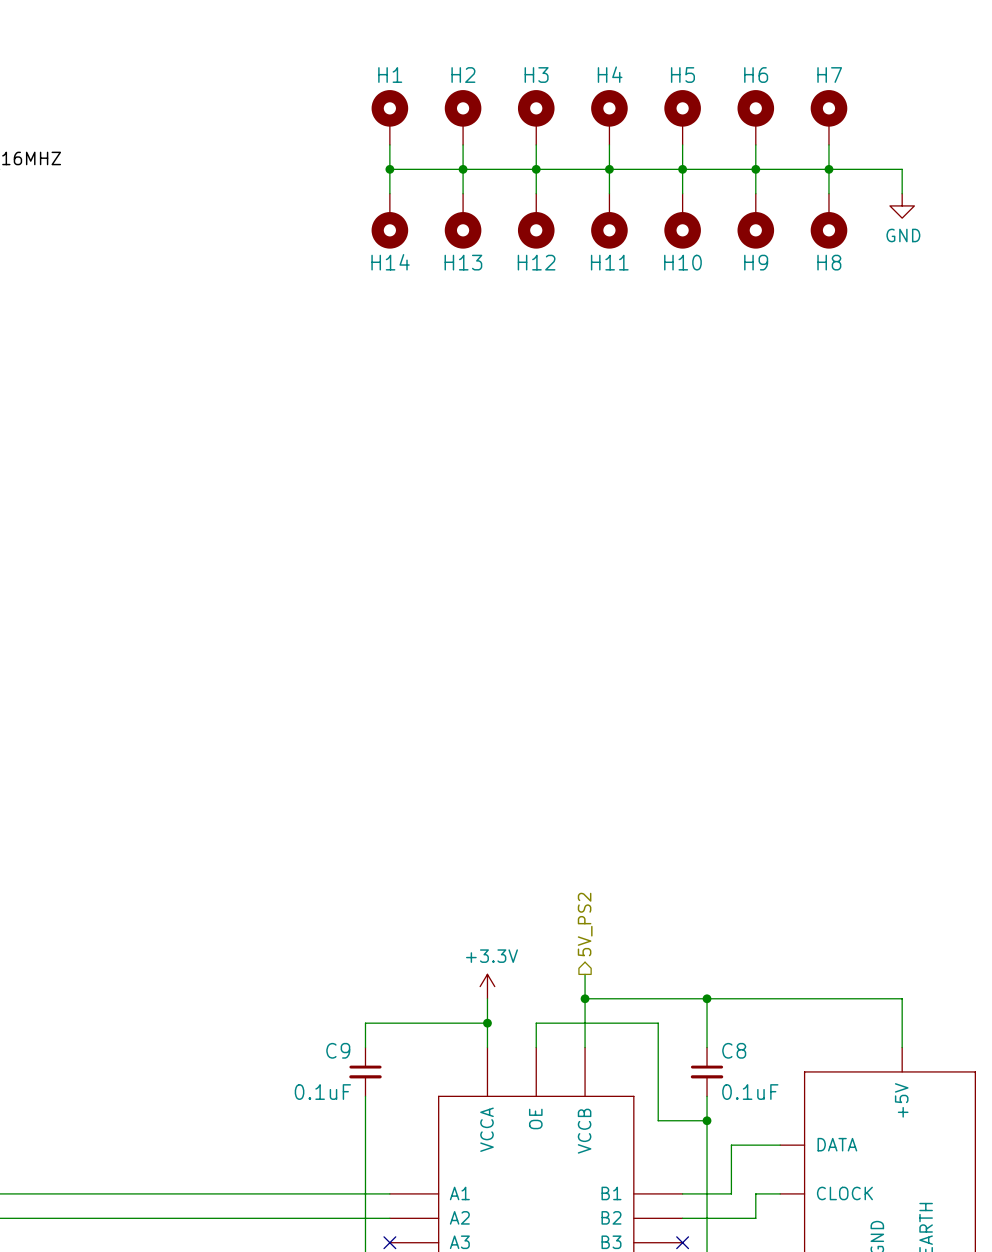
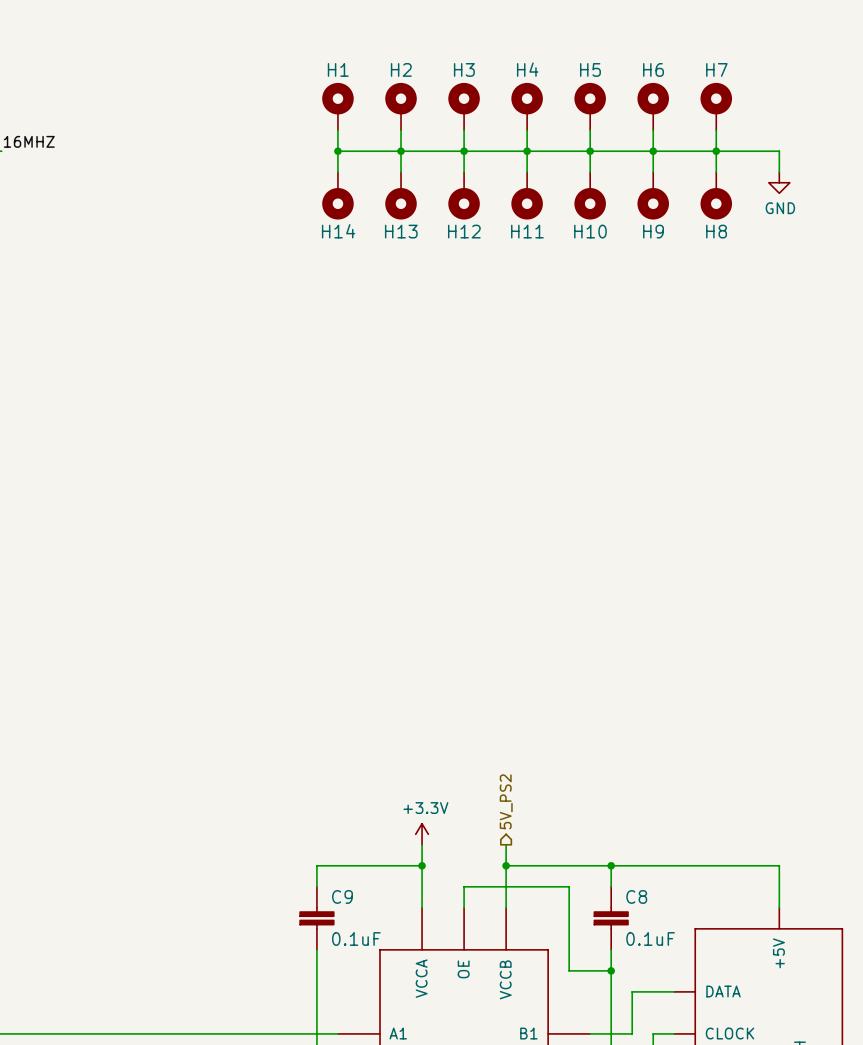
wire: none -> (422, 844) (422, 865) (316, 865) (316, 886)
power symbol position: +3.3V (487, 986) -> +3.3V (422, 834)
wire: (487, 1023) (365, 1023) (365, 1047) -> none
junction position: (487, 1023) -> (422, 865)
C9 symbol: [349, 1047, 382, 1097] -> [300, 886, 334, 950]
C8 symbol: [690, 1047, 724, 1097] -> [594, 886, 629, 950]
C9 name position: C9 (338, 1050) -> C9 (342, 896)
C9 value position: 0.1uF (322, 1092) -> 0.1uF (356, 939)

